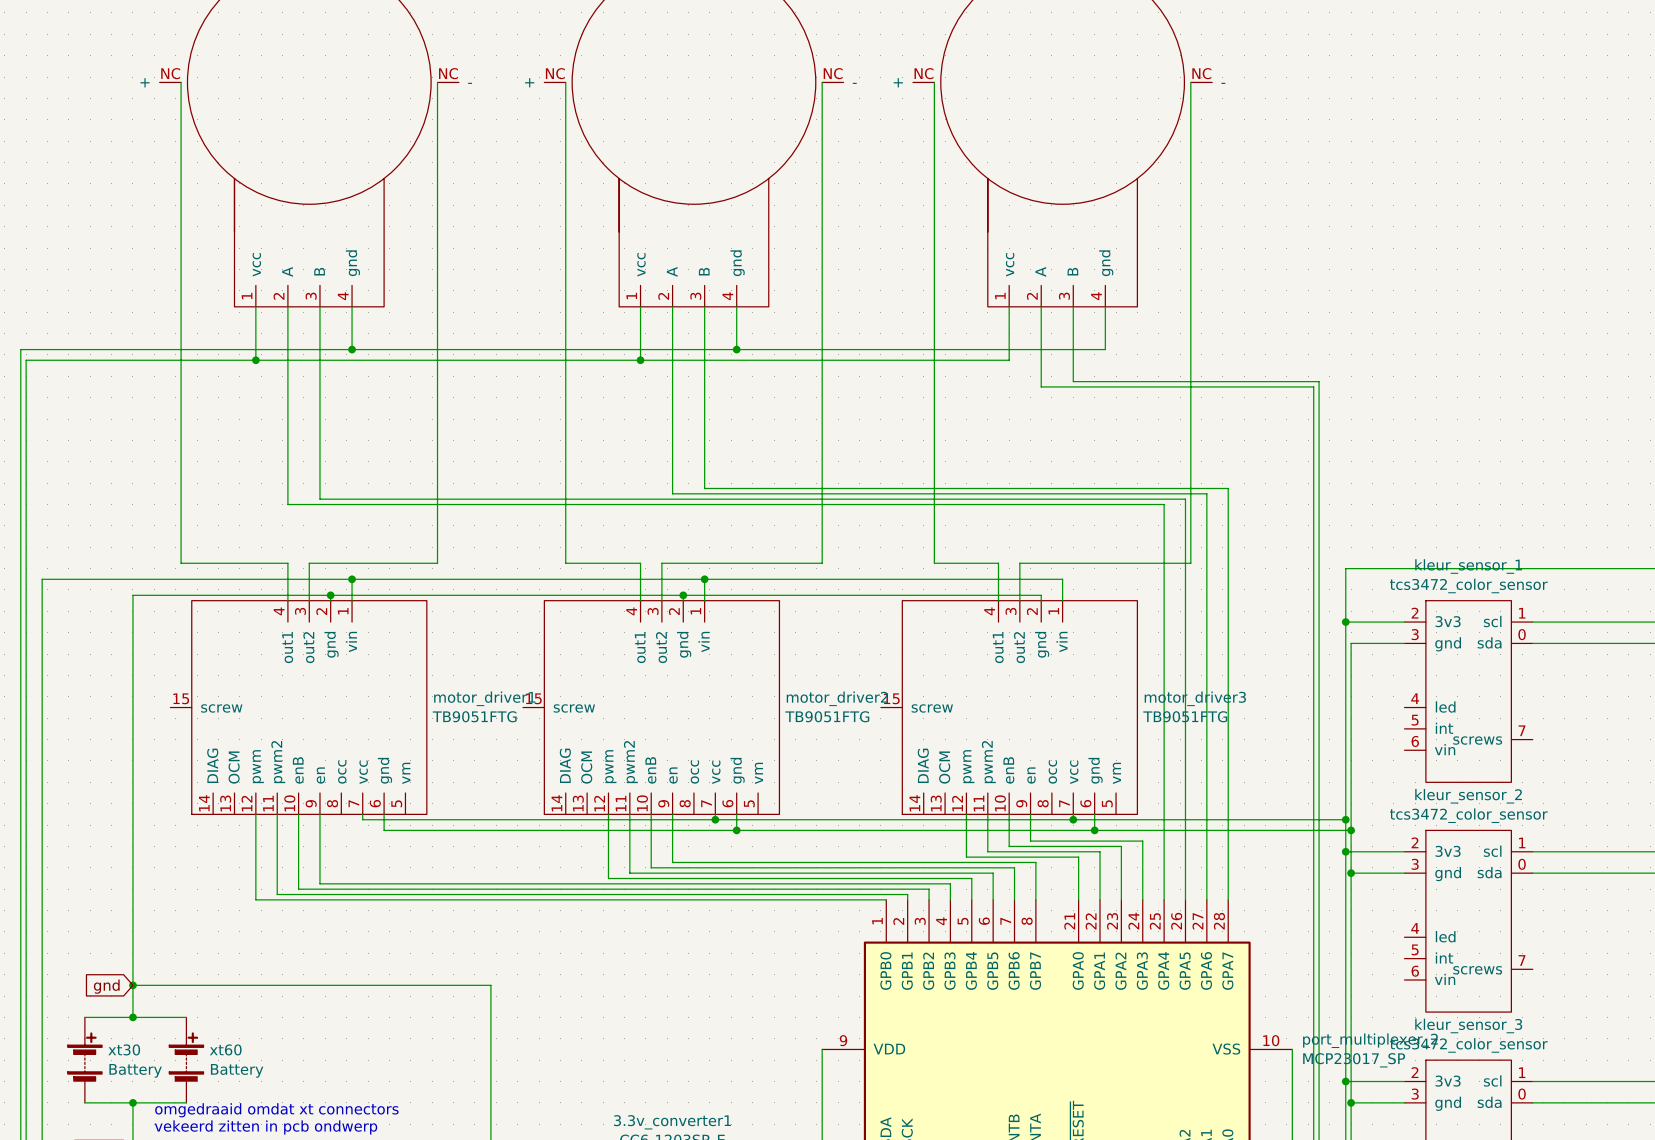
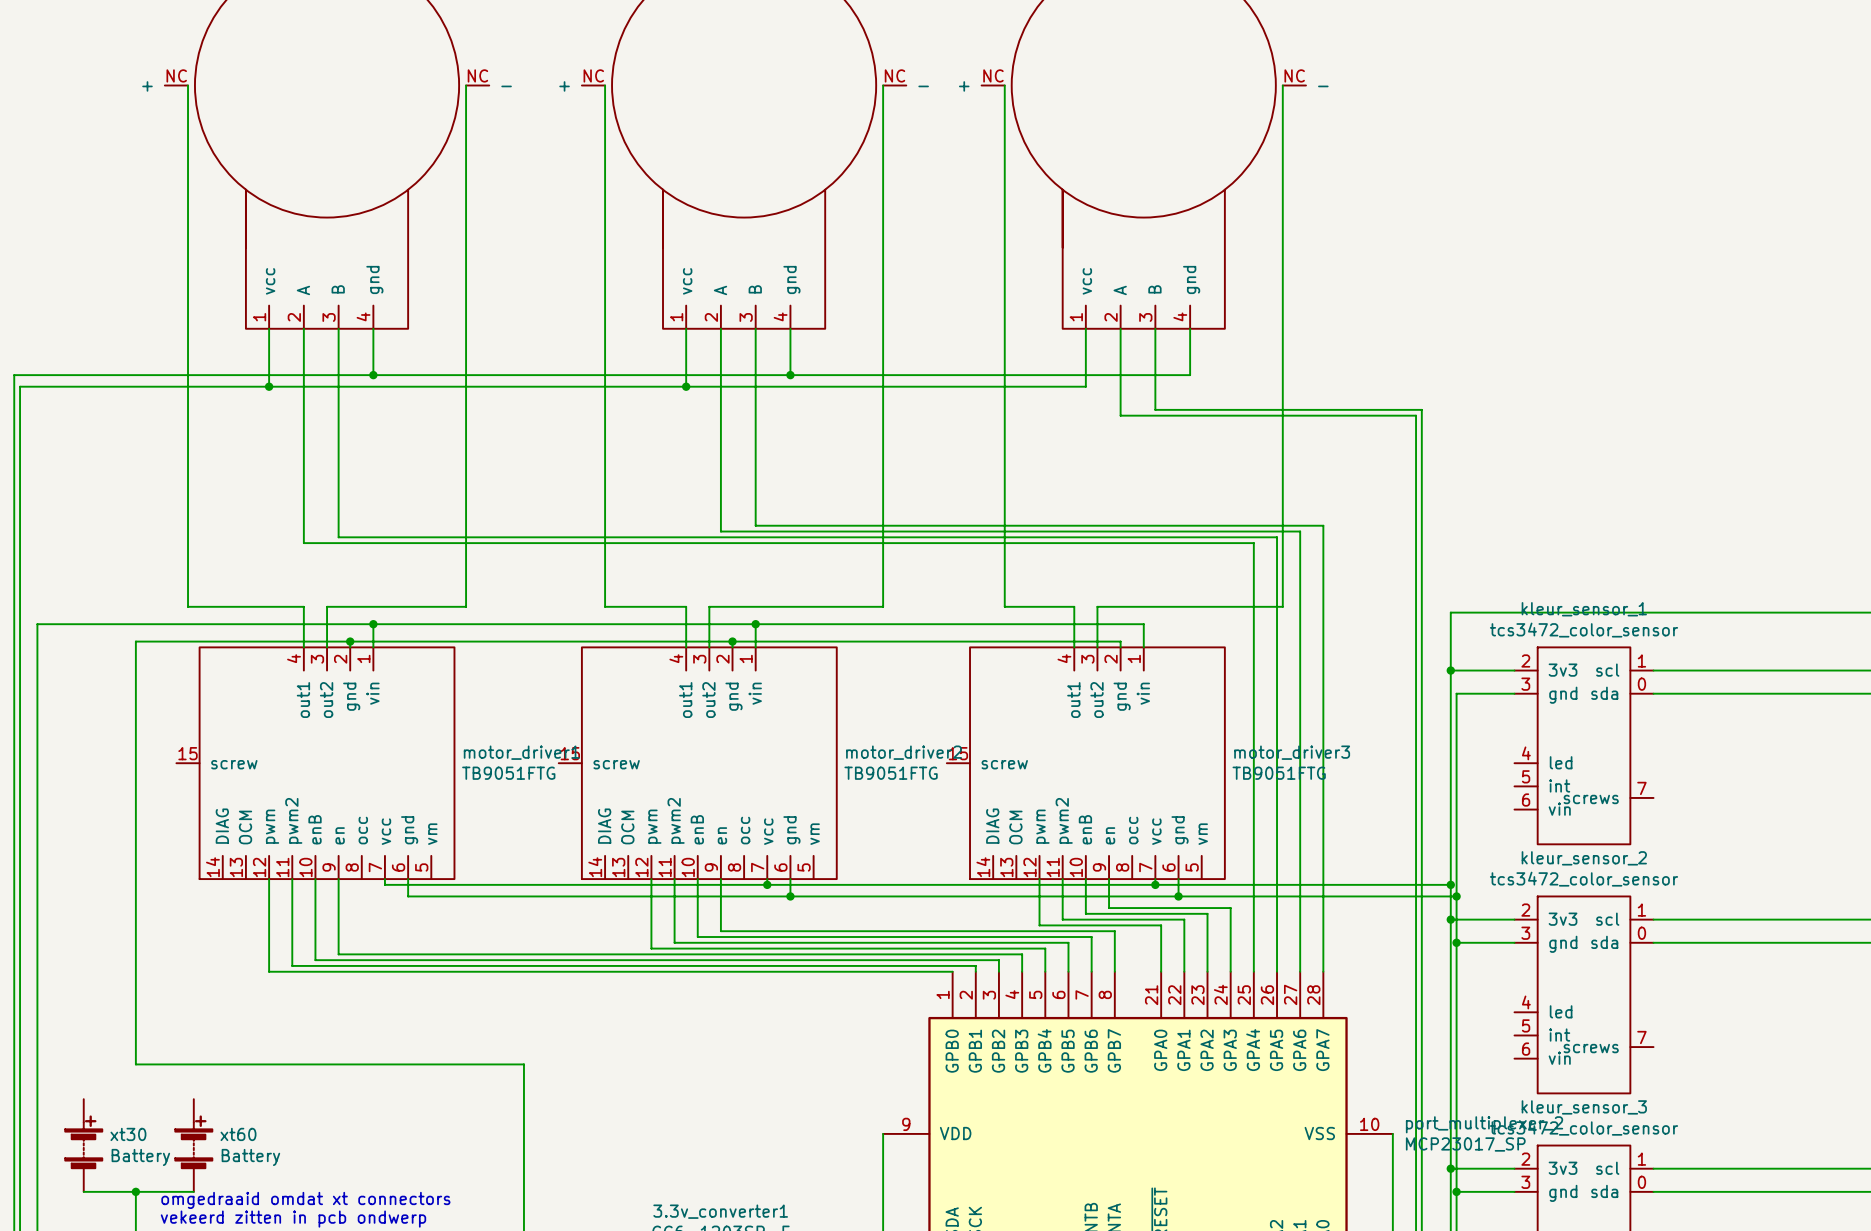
wire: (132, 985) (132, 1017) -> none
junction: (132, 985) -> none
global label: gnd (106, 986) -> none
wire: (84, 1017) (186, 1017) -> none
junction: (132, 1017) -> none

